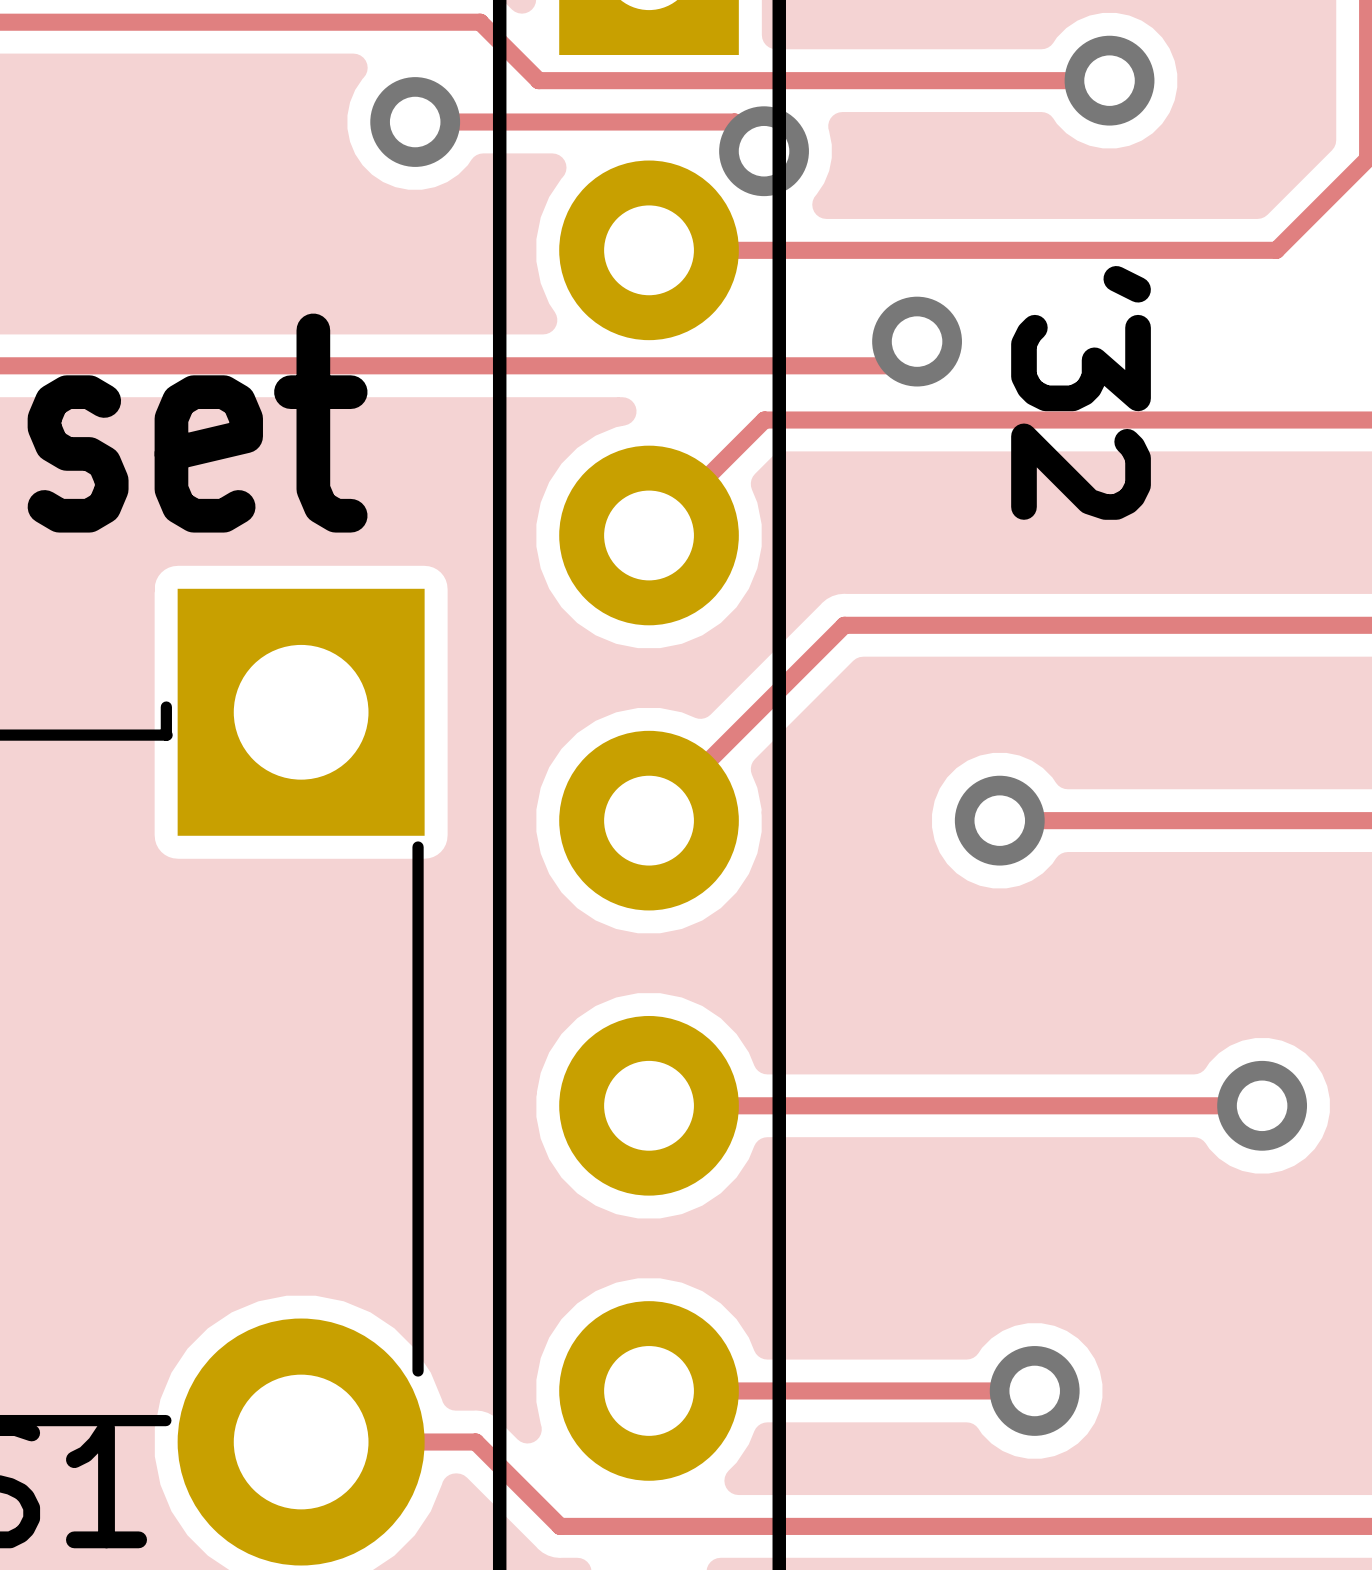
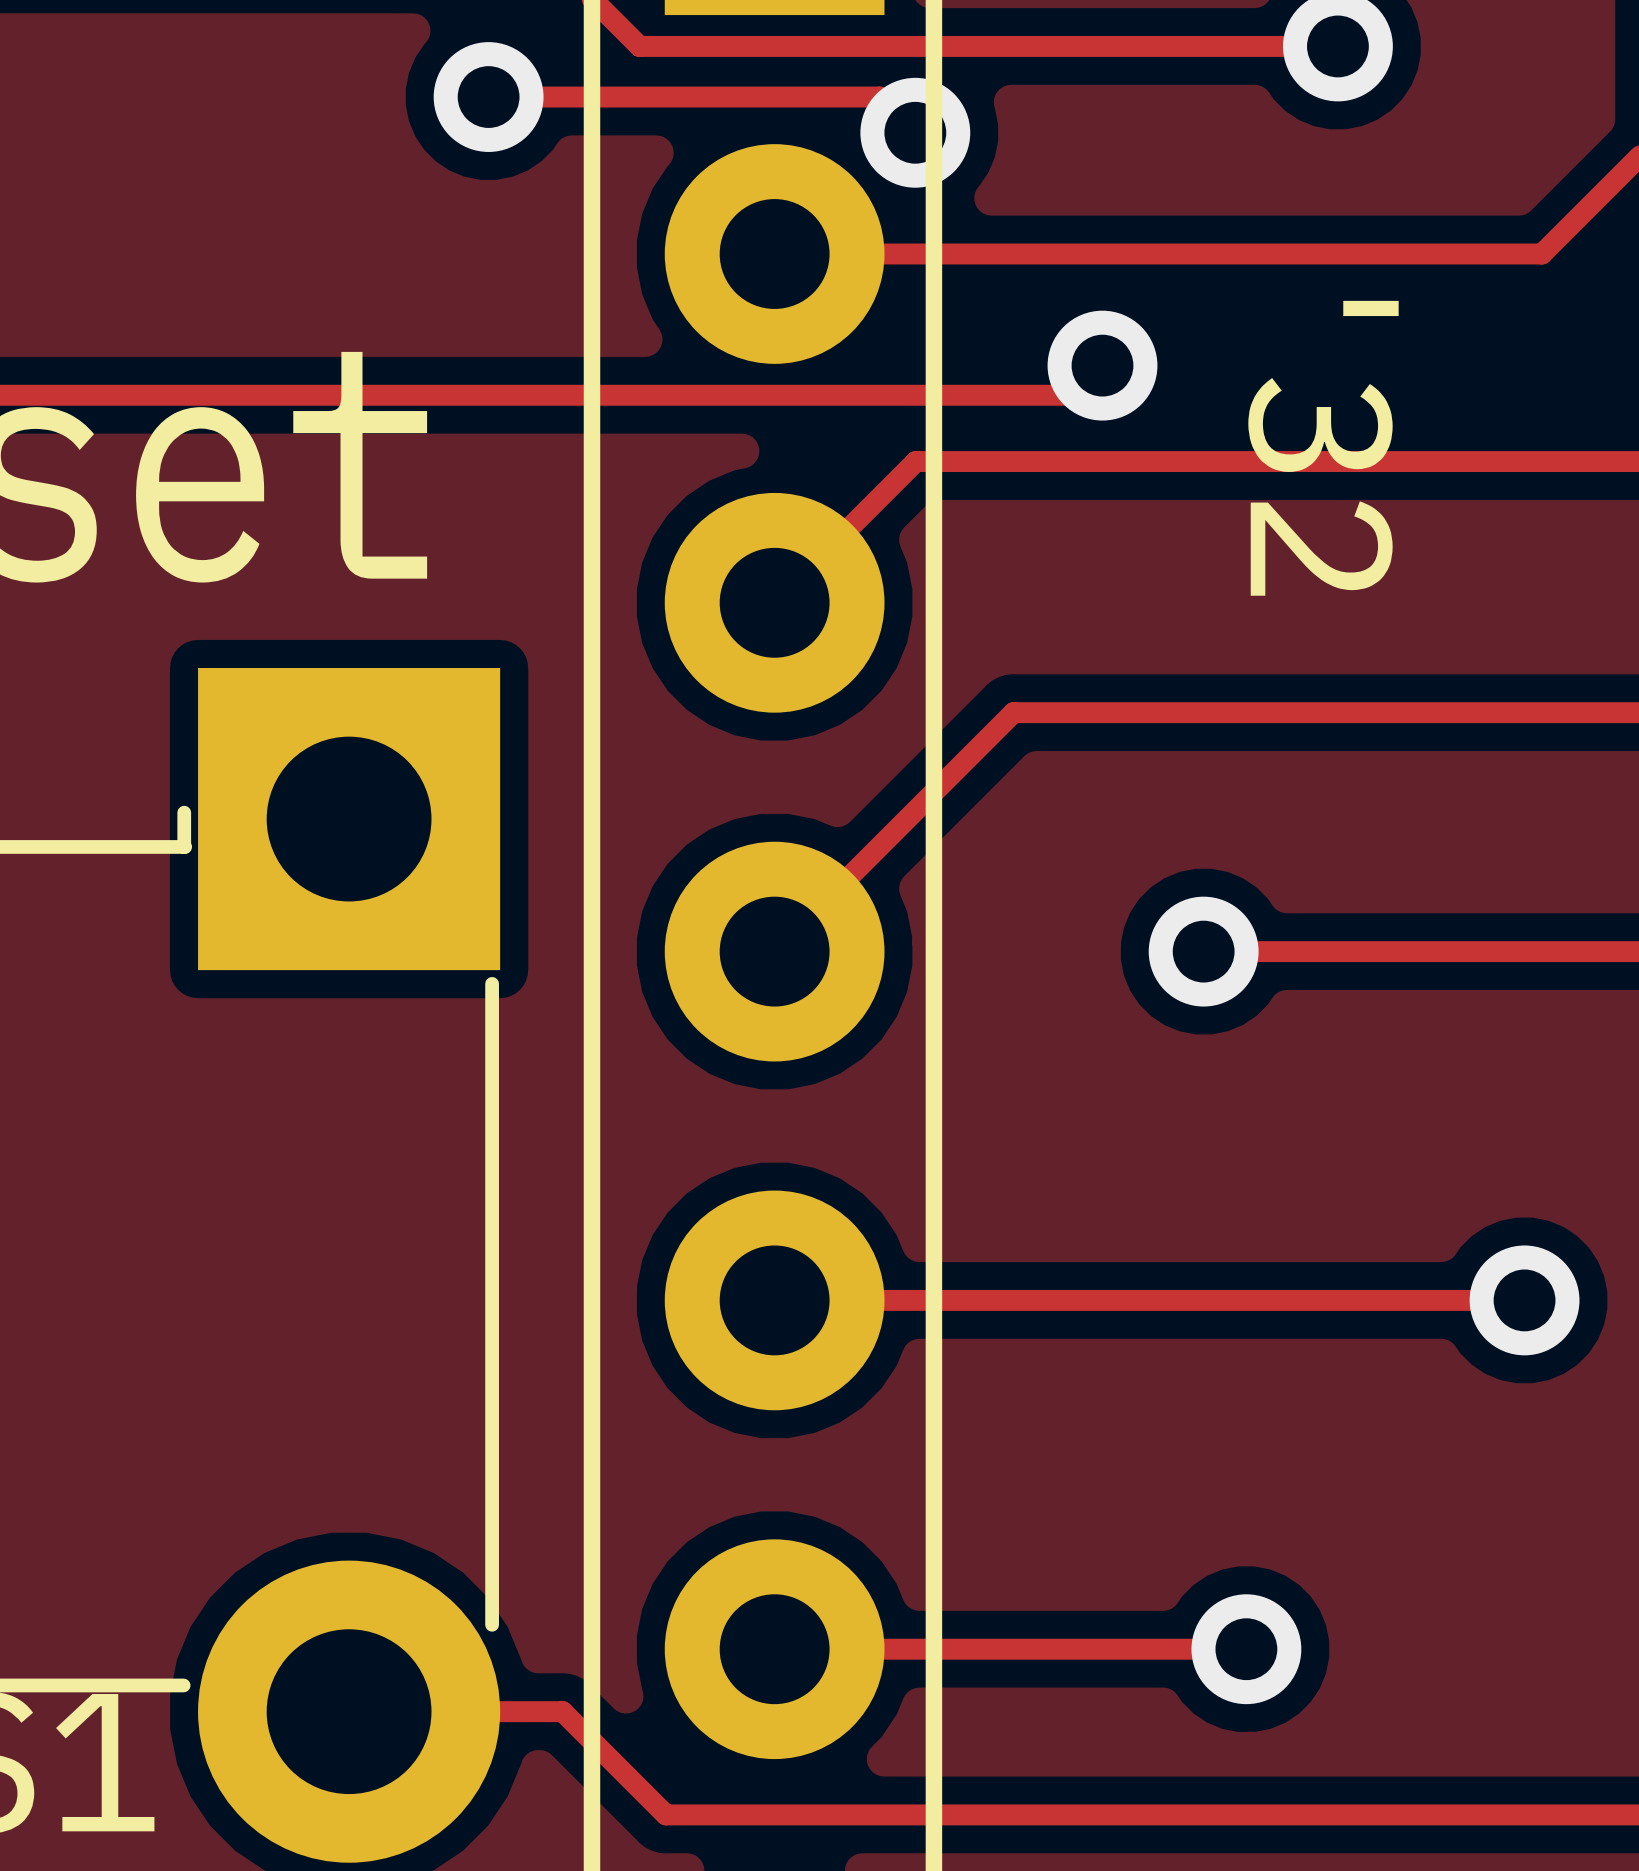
text position: '32 (1081, 392) -> '32 (1323, 448)

